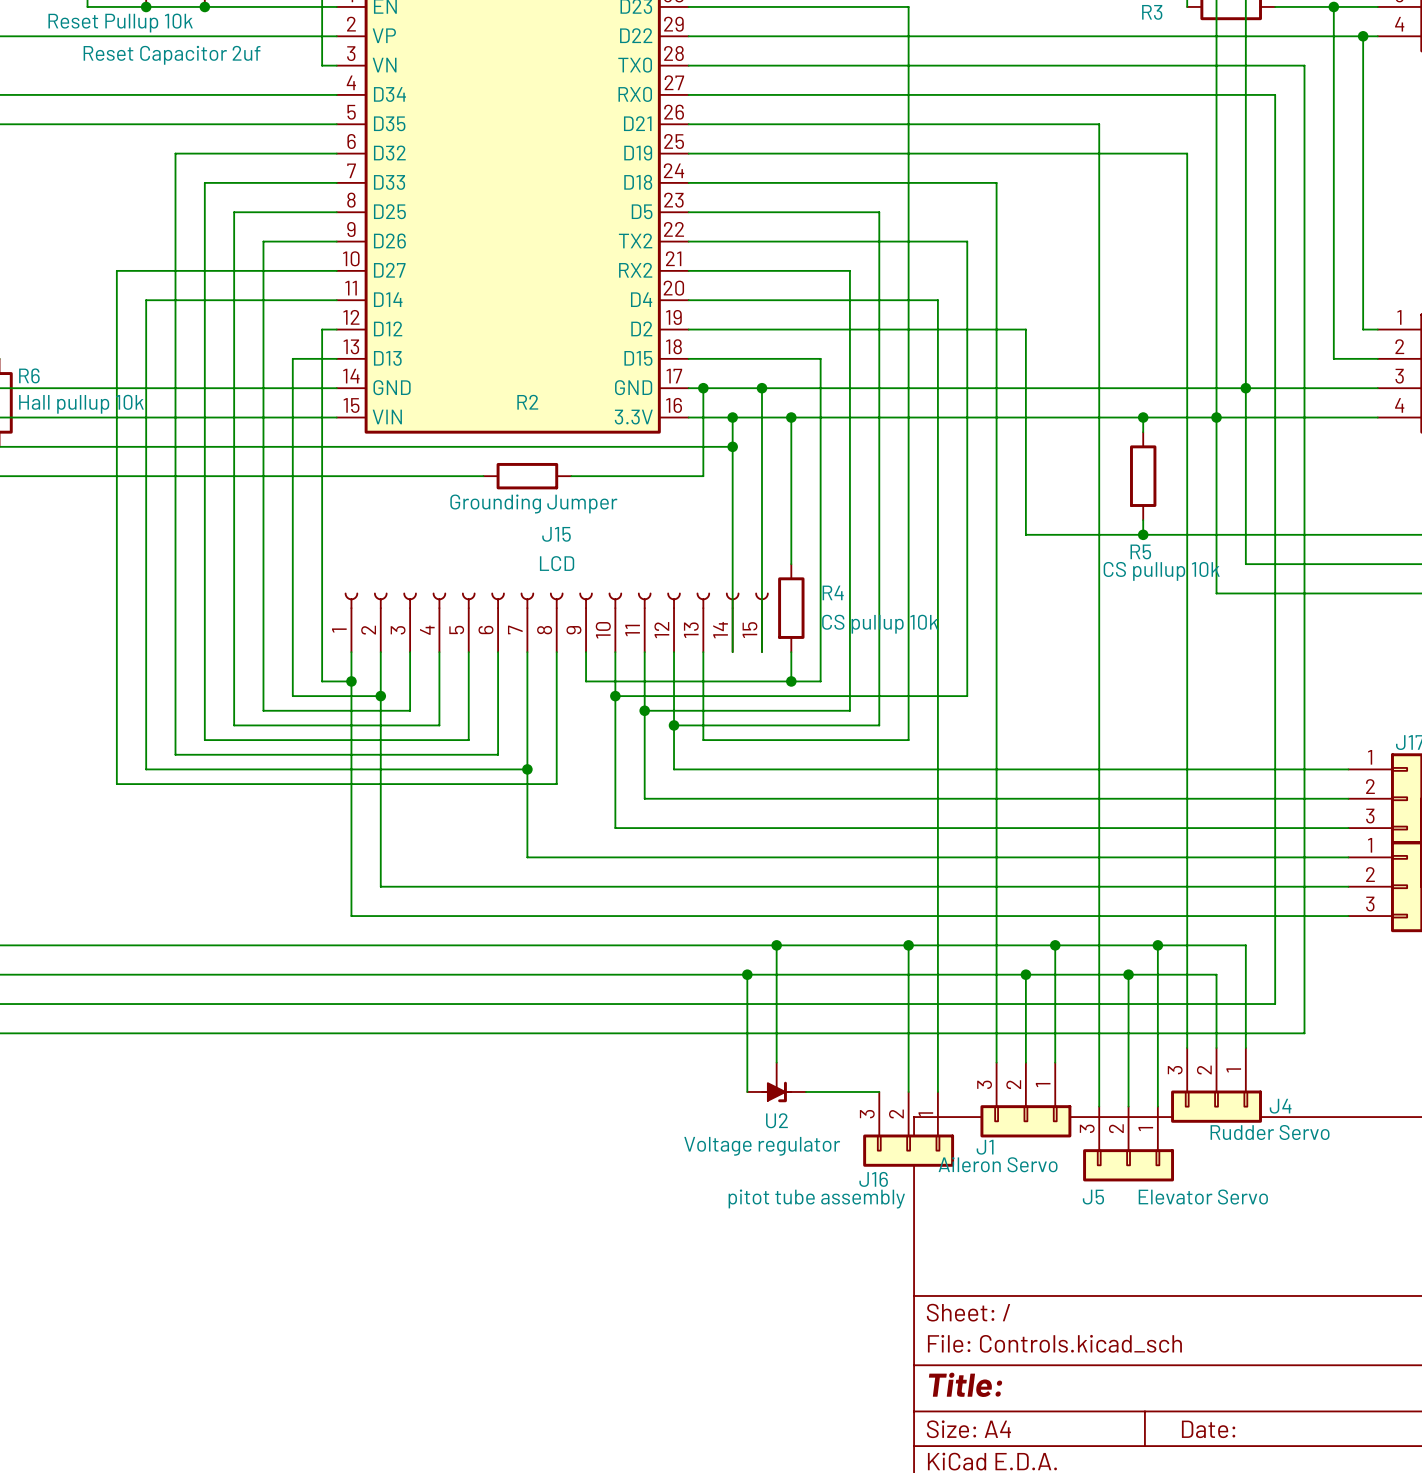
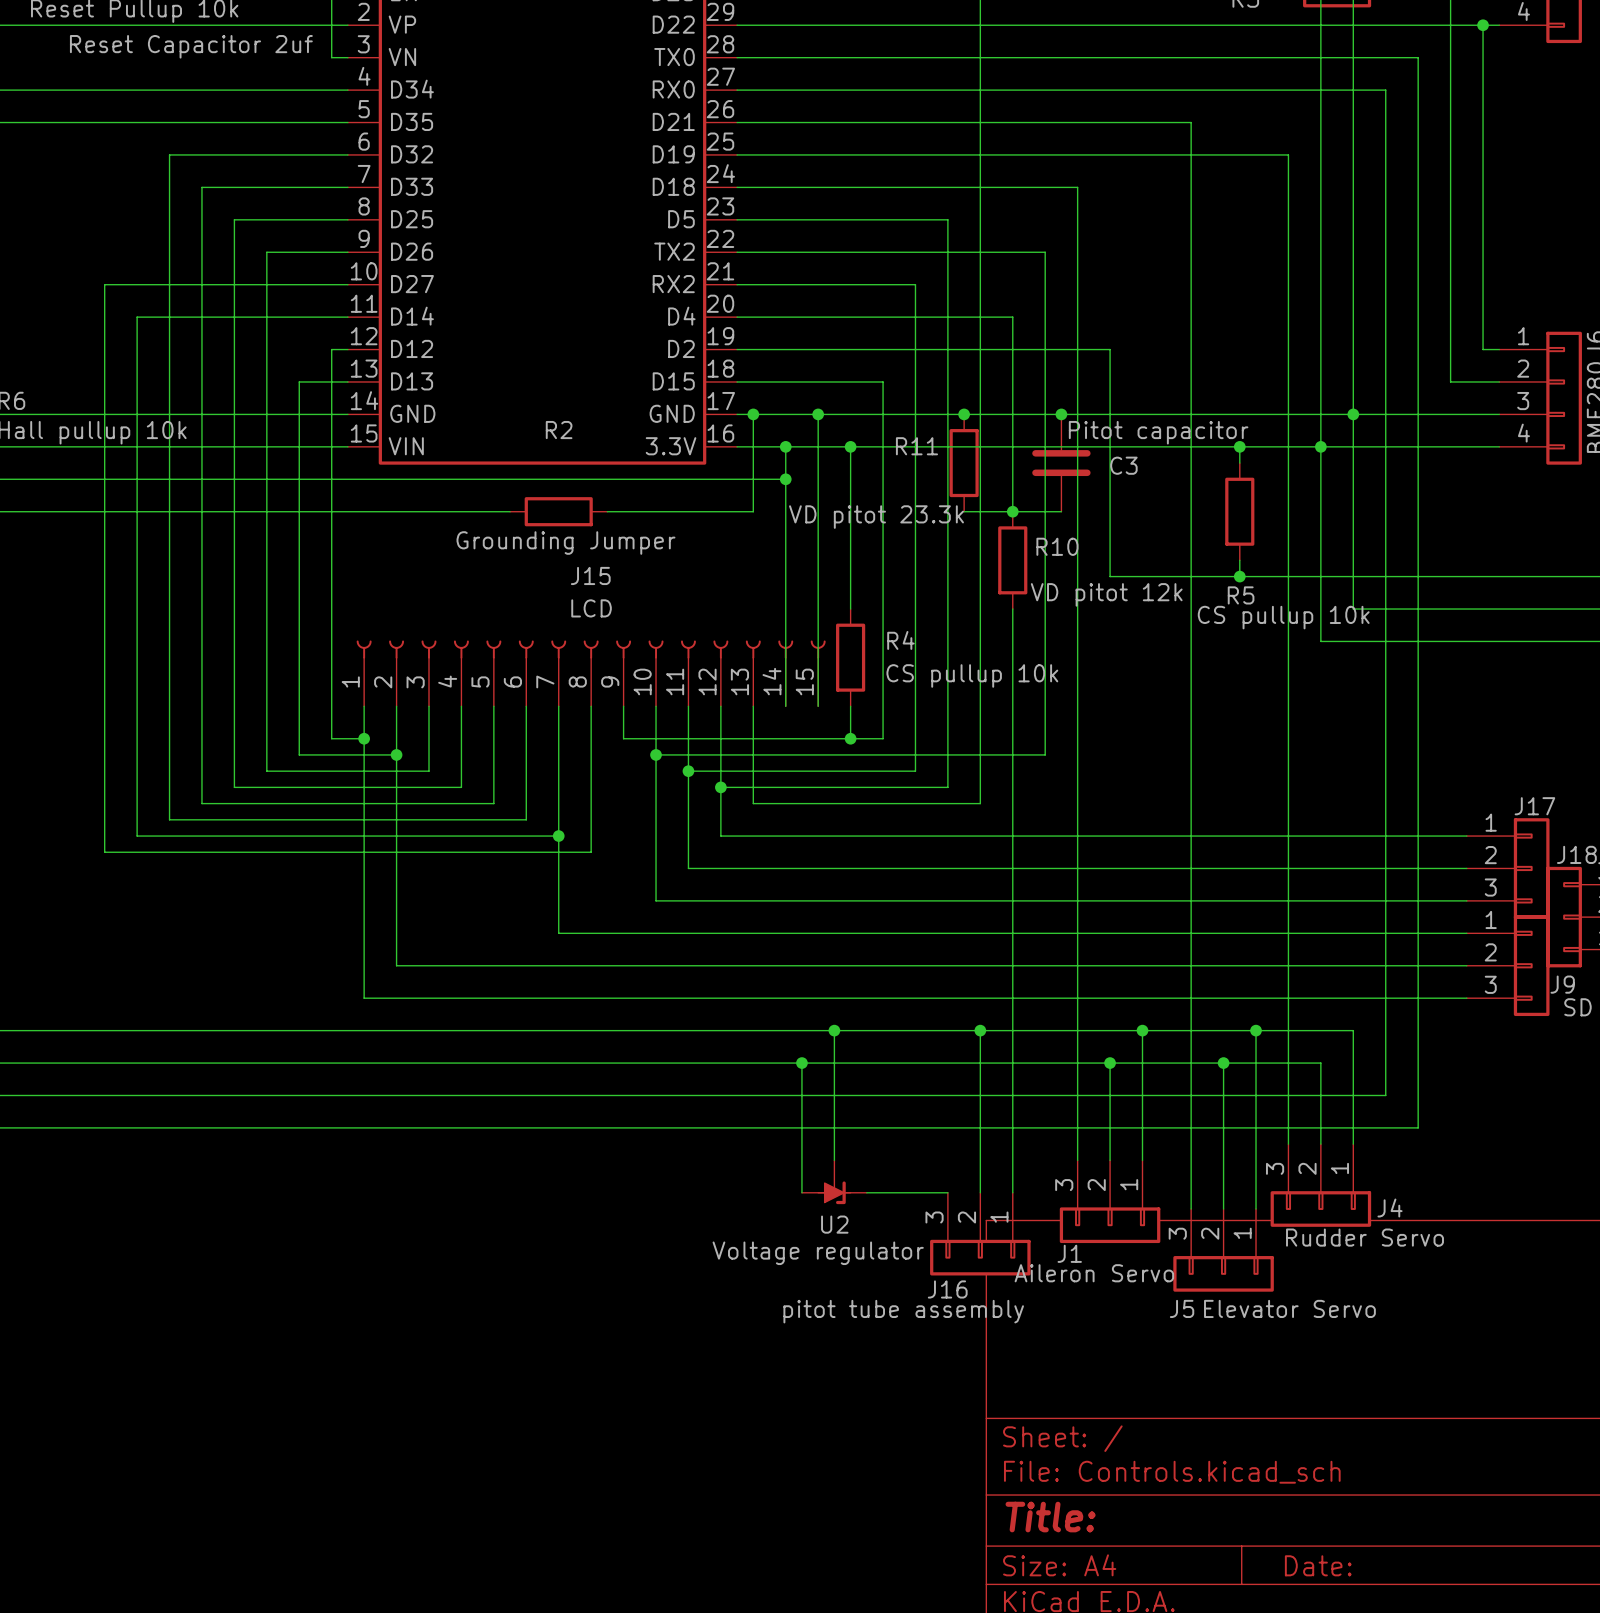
junction: none -> (964, 414)
junction: none -> (1061, 414)
R11: none -> VD pitot 23.3k (964, 463)
C3: none -> Pitot capacitor (1061, 463)
wire: none -> (964, 511) (1061, 511)
wire: (937, 476) (937, 564) -> none
junction: none -> (1012, 511)
R10: none -> VD pitot 12k (1012, 560)

